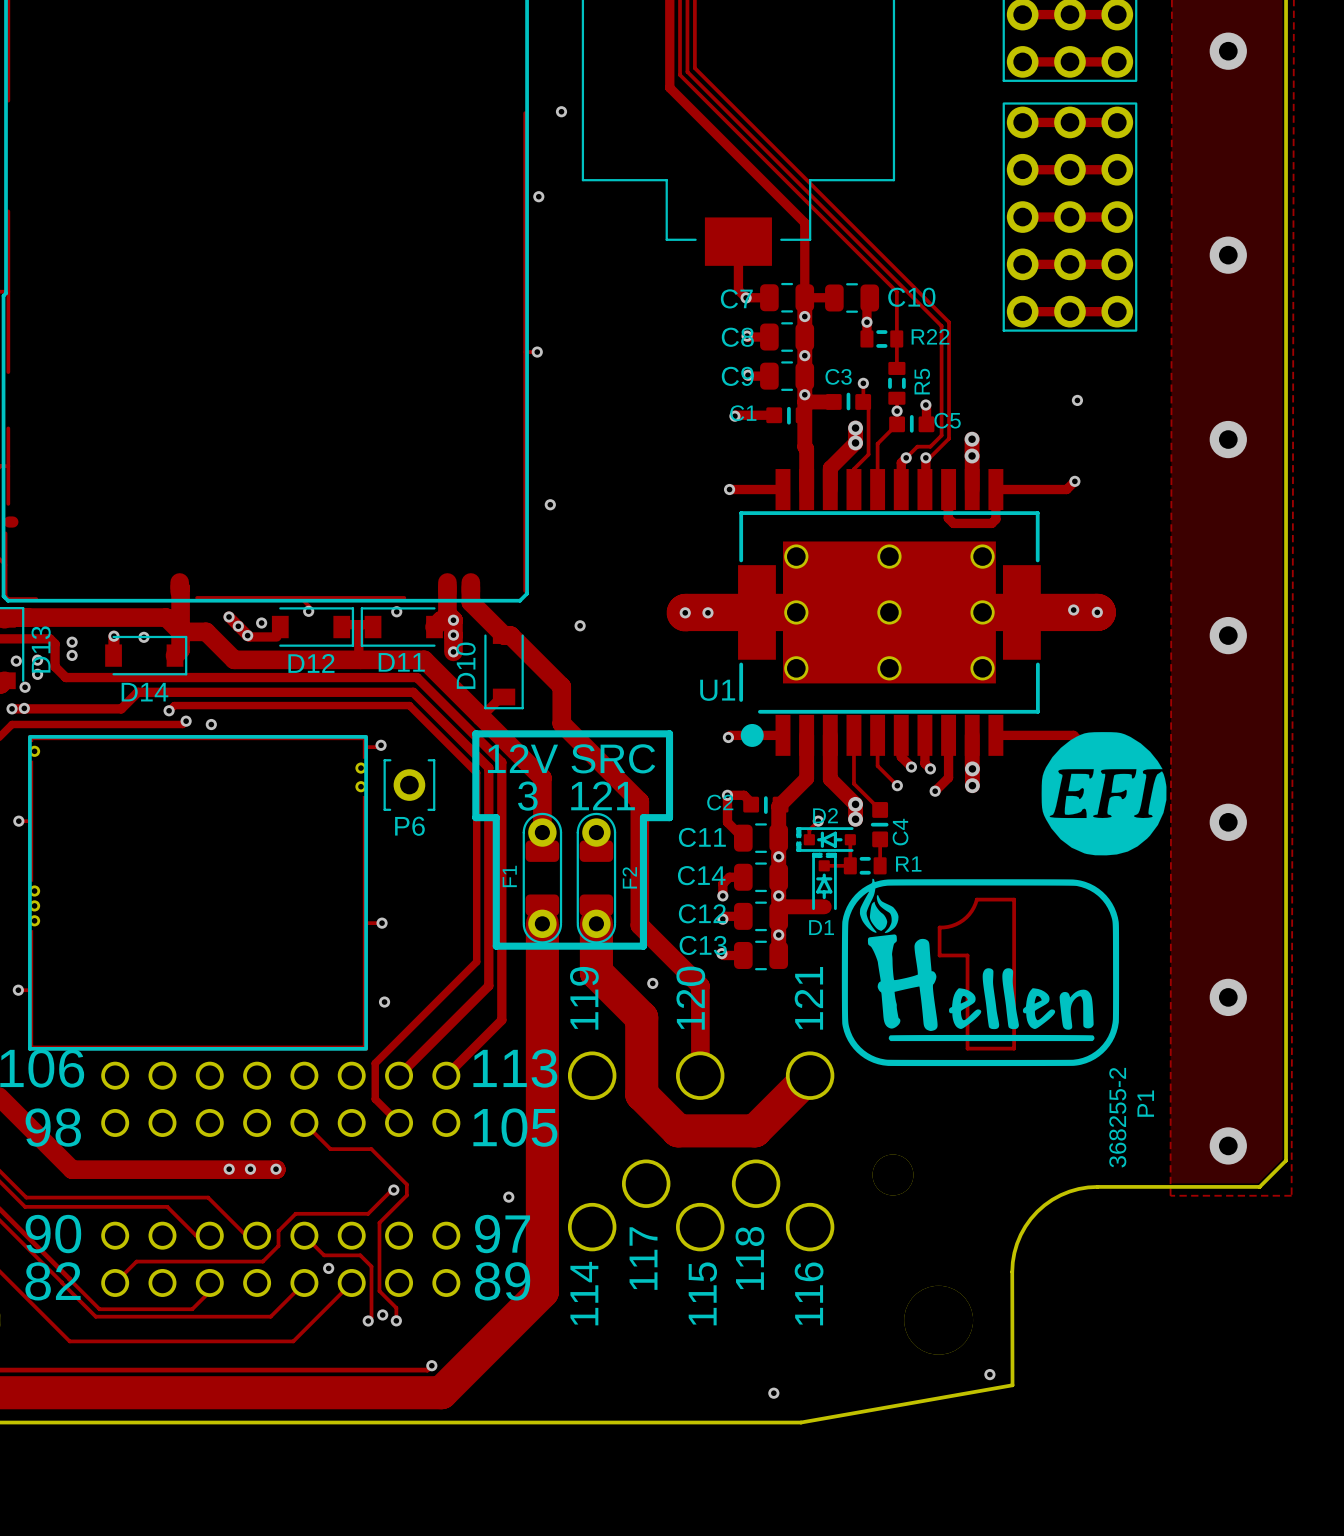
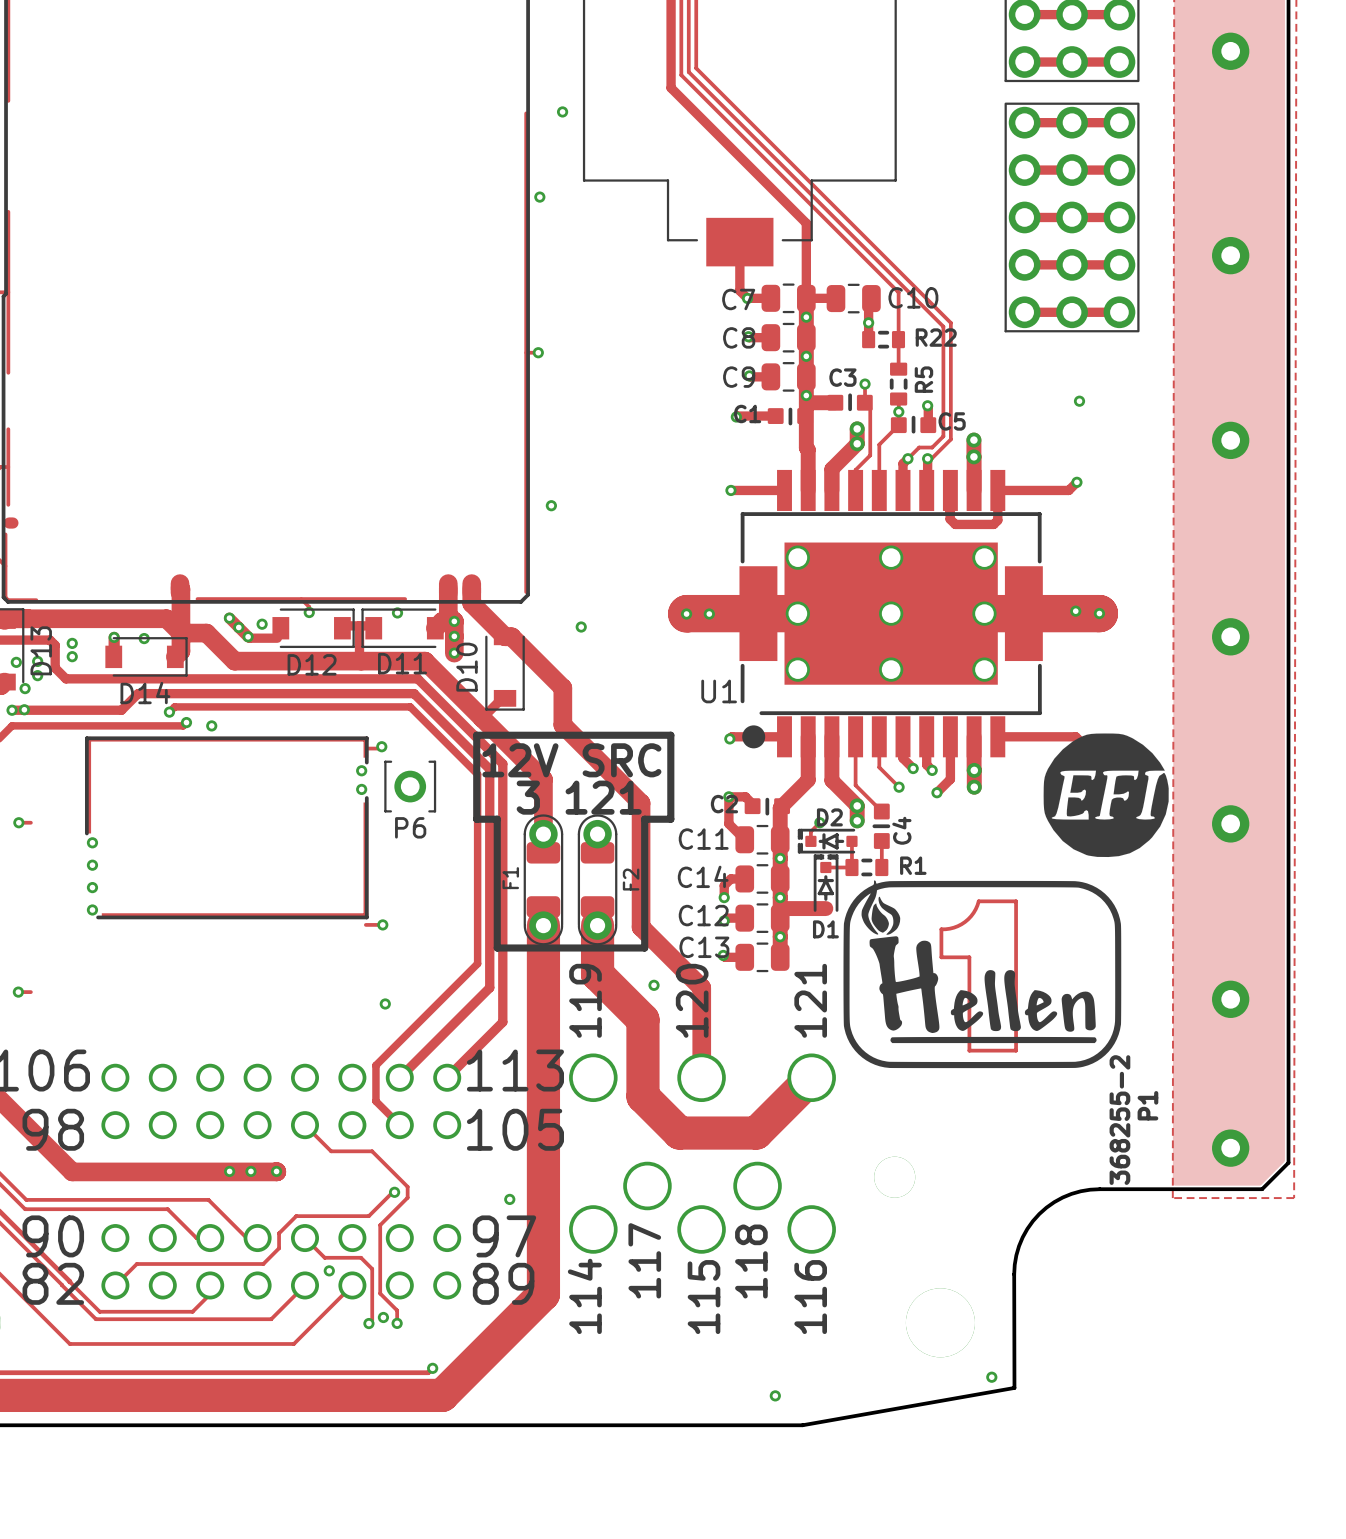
part: none -> (226, 827)
part: (197, 892) -> none

